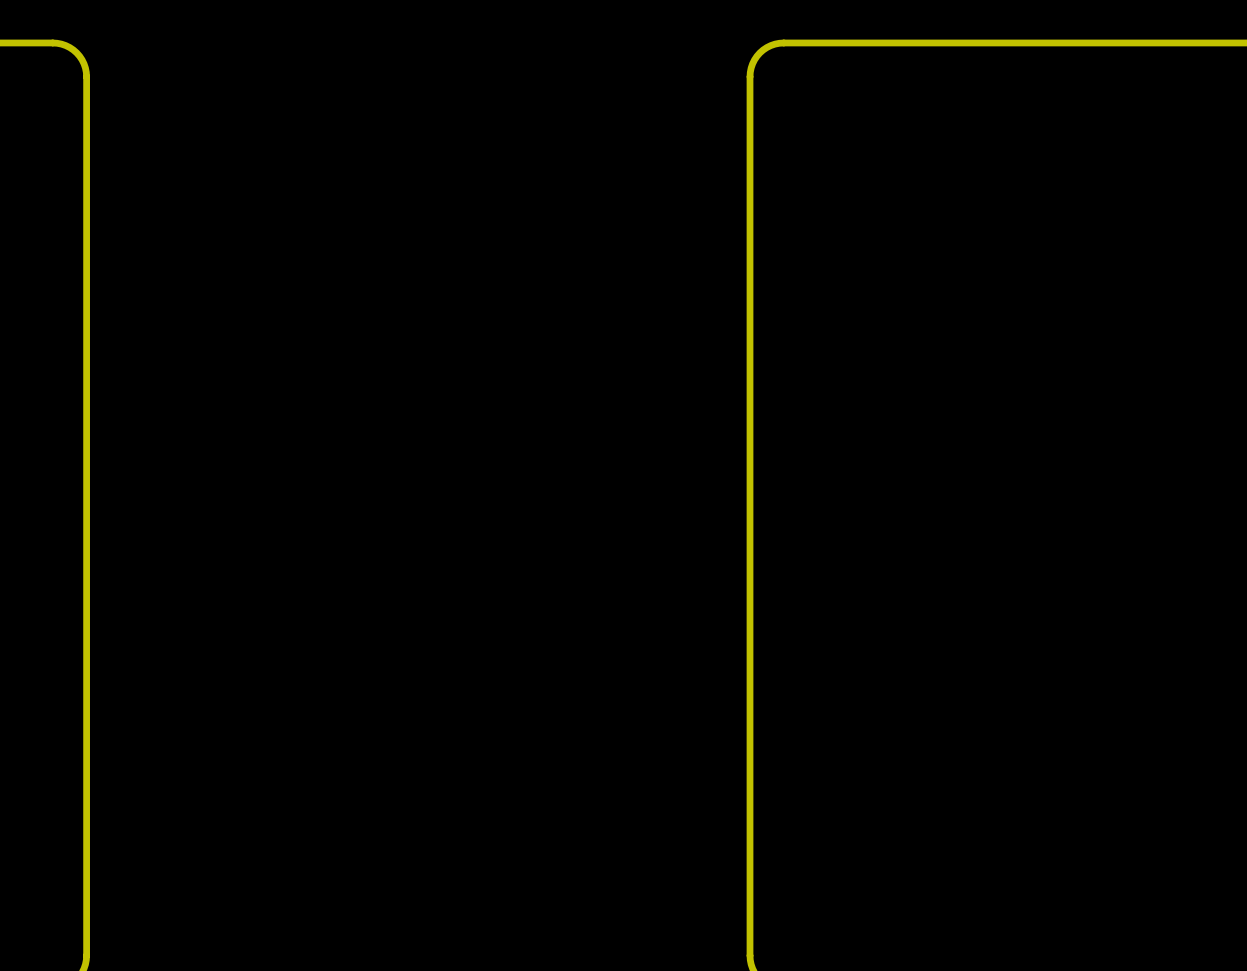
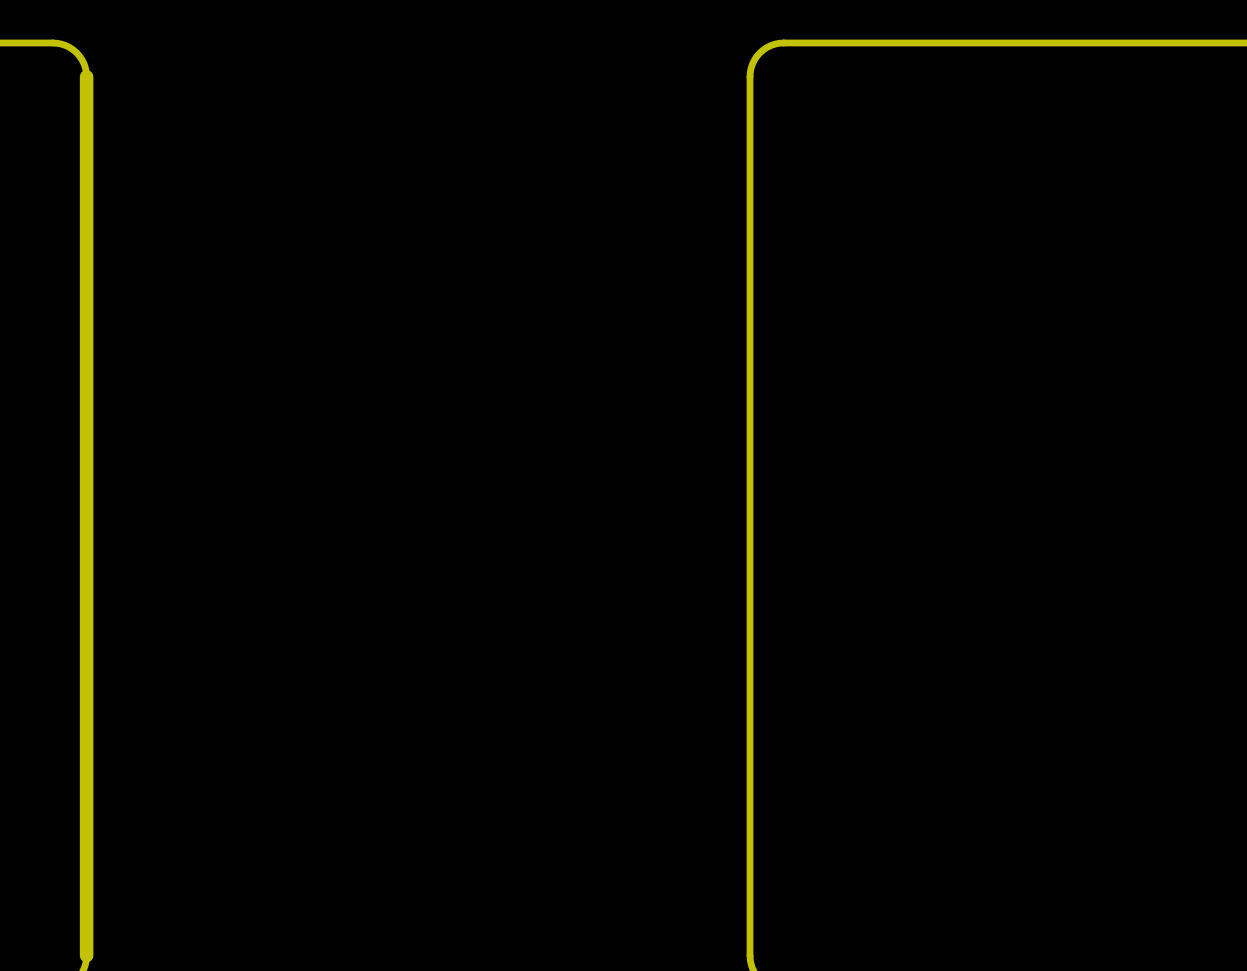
board edge width: thin (86, 76) (86, 955) -> thick (86, 76) (86, 955)

